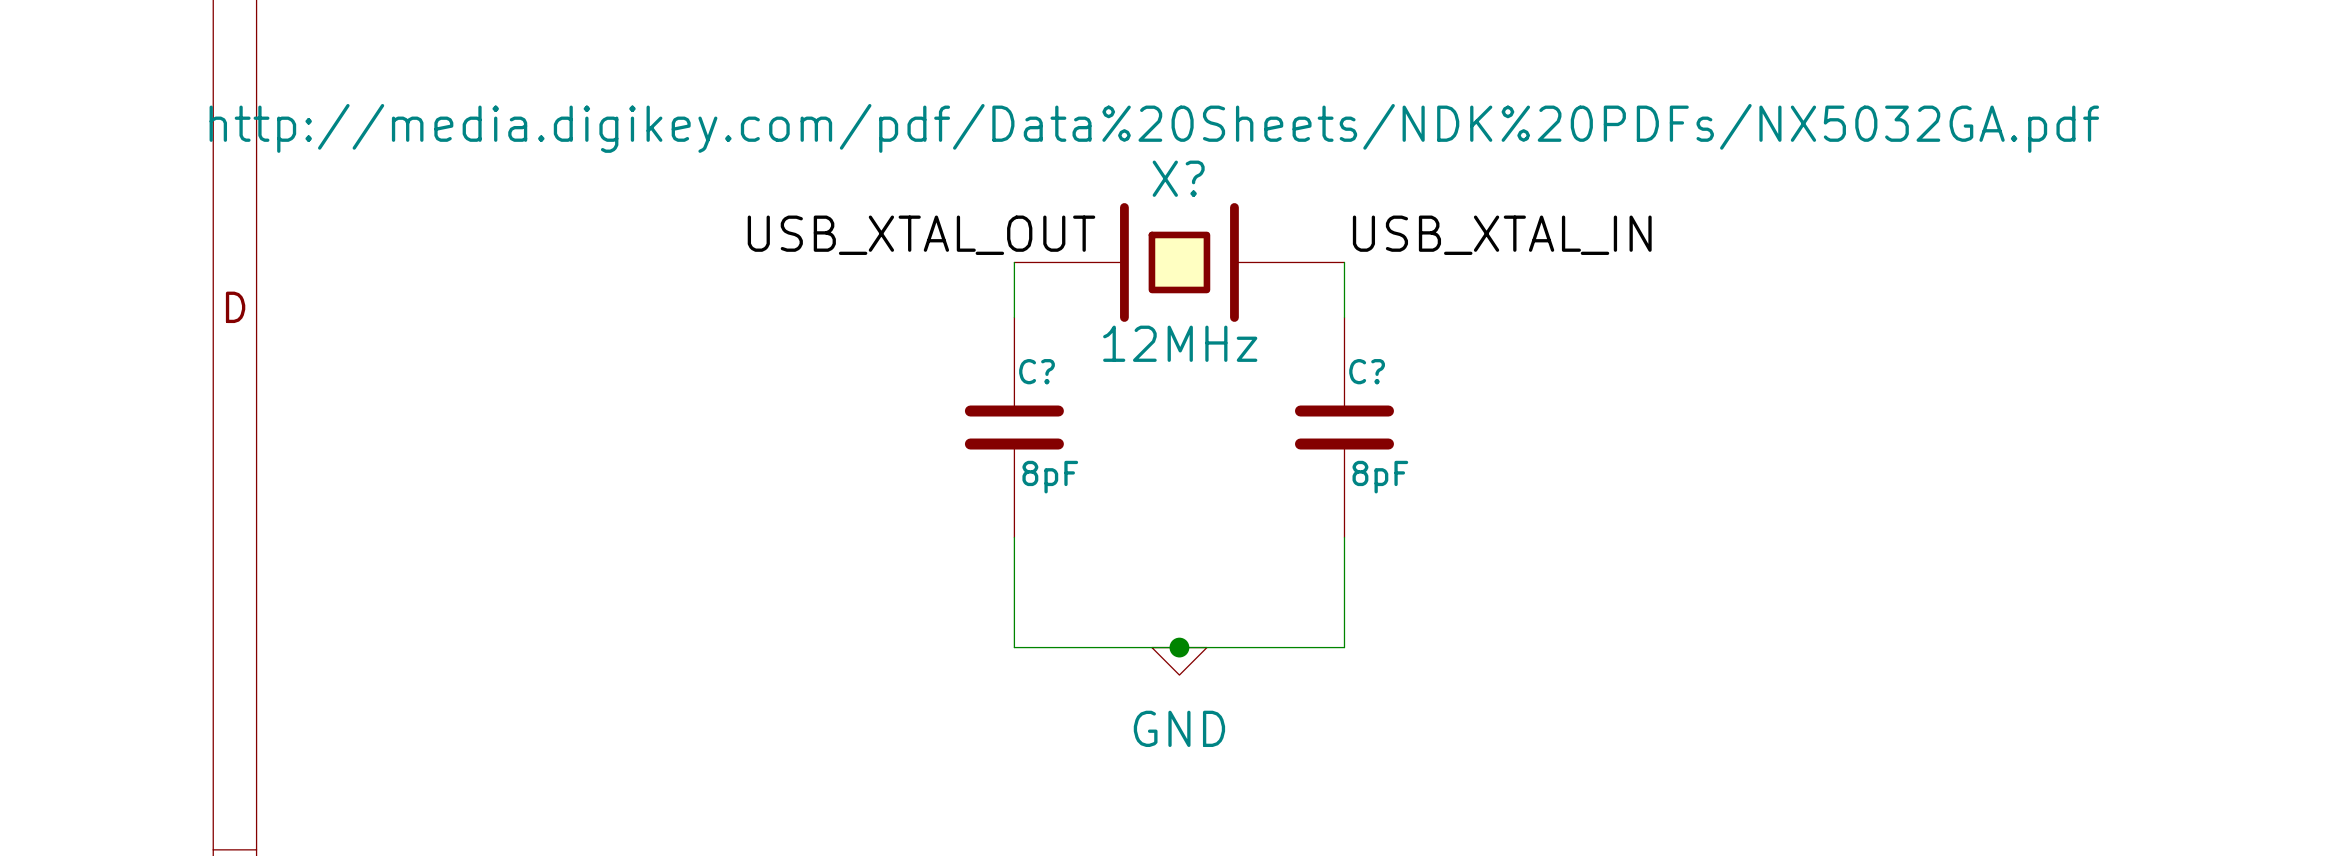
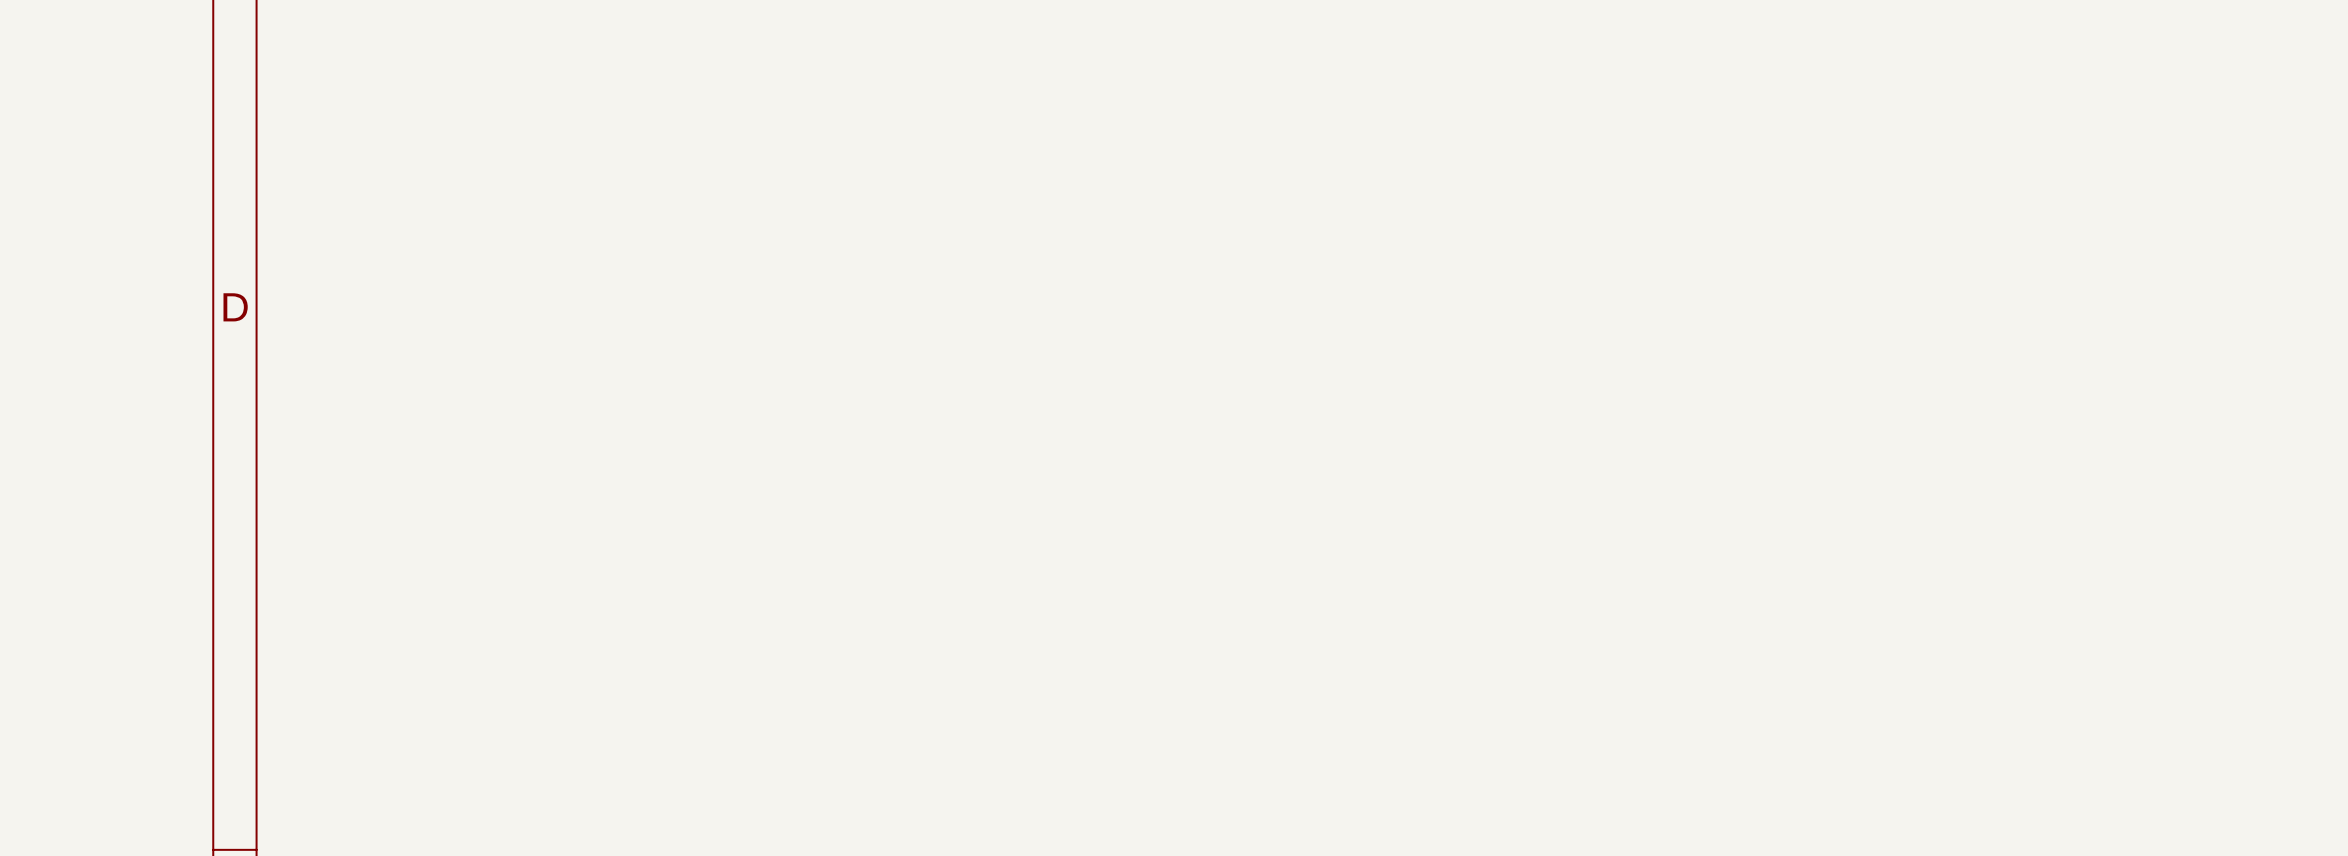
label: USB_XTAL_OUT (921, 235) -> none
label: USB_XTAL_IN (1502, 235) -> none
wire: (1014, 262) (1014, 317) -> none
X?: 12MHz (1179, 262) -> none
wire: (1344, 262) (1344, 317) -> none
C?: 8pF (1014, 427) -> none
C?: 8pF (1344, 427) -> none
wire: (1014, 537) (1014, 647) (1344, 647) (1344, 537) -> none
junction: (1179, 647) -> none
power symbol: GND (1179, 661) -> none

